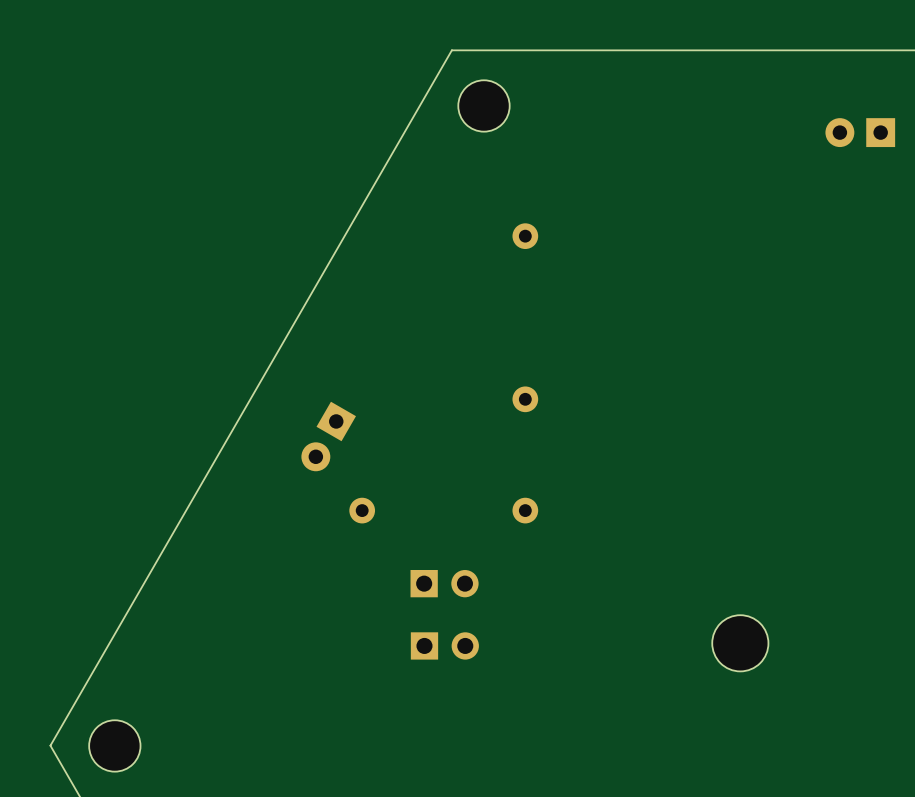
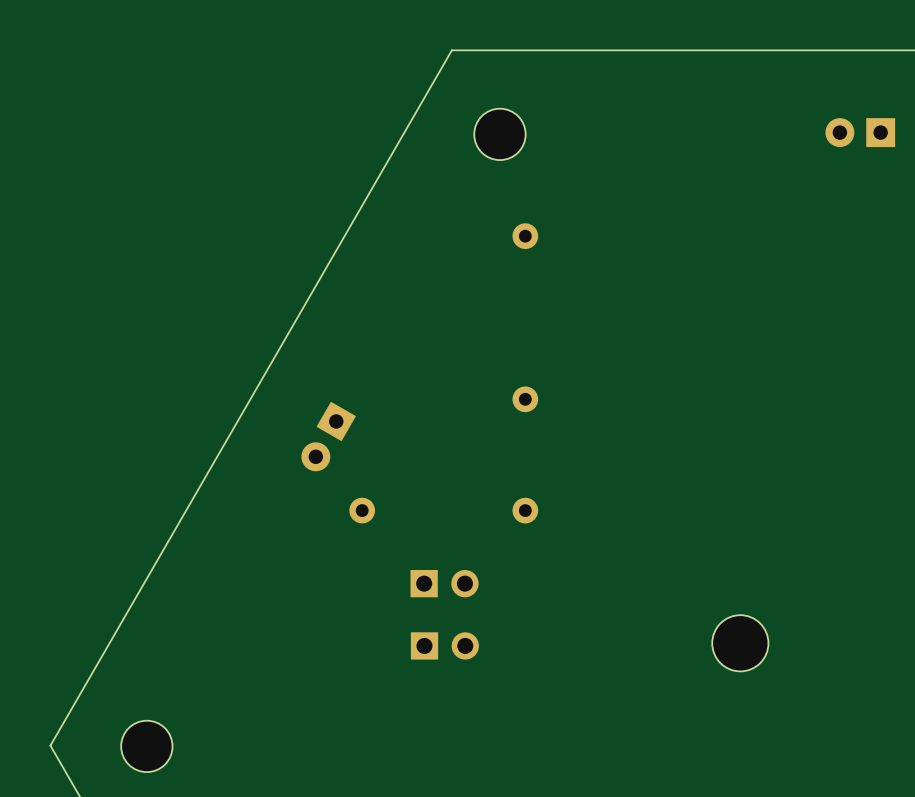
part position: (483, 105) -> (499, 134)
part position: (114, 745) -> (146, 746)

